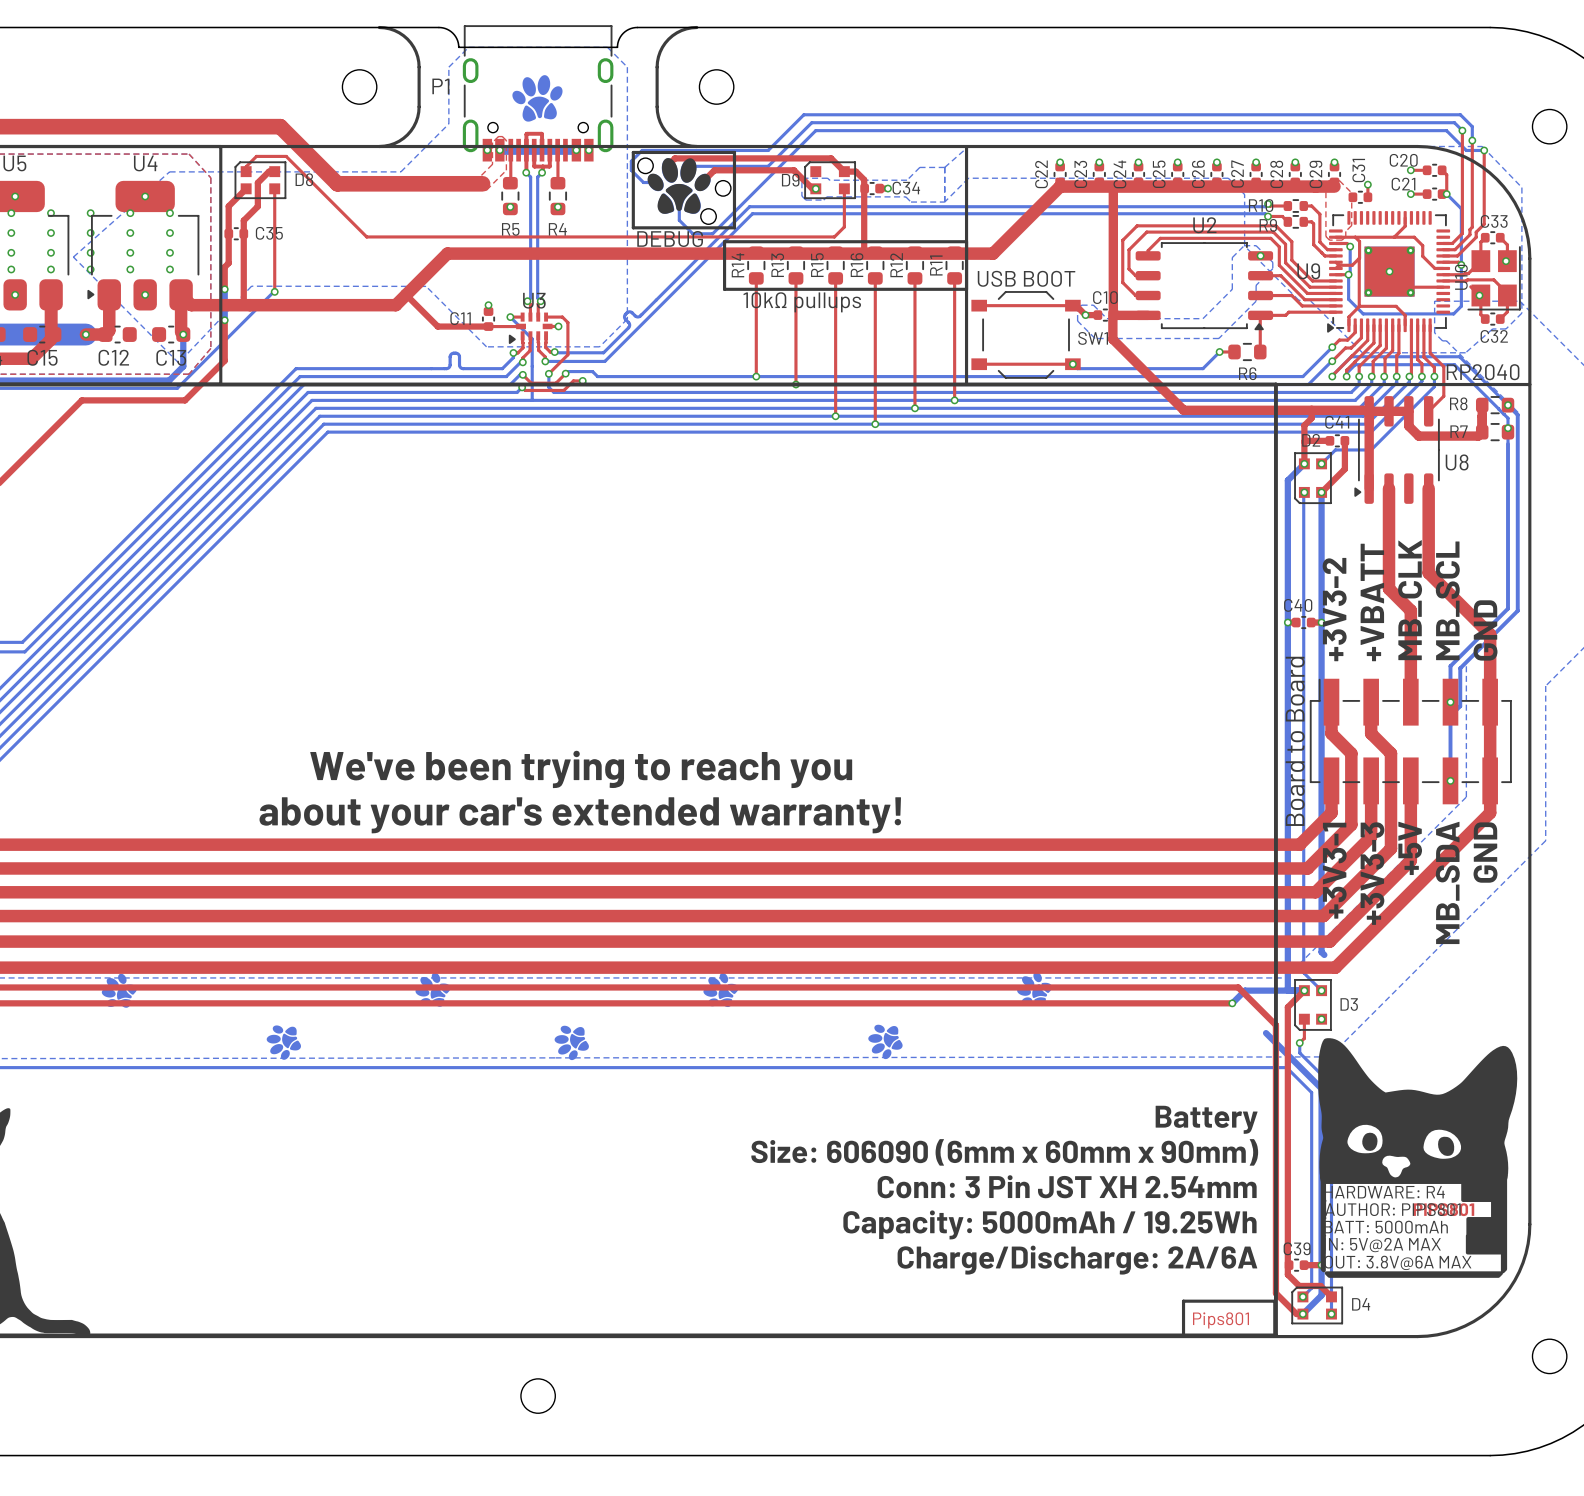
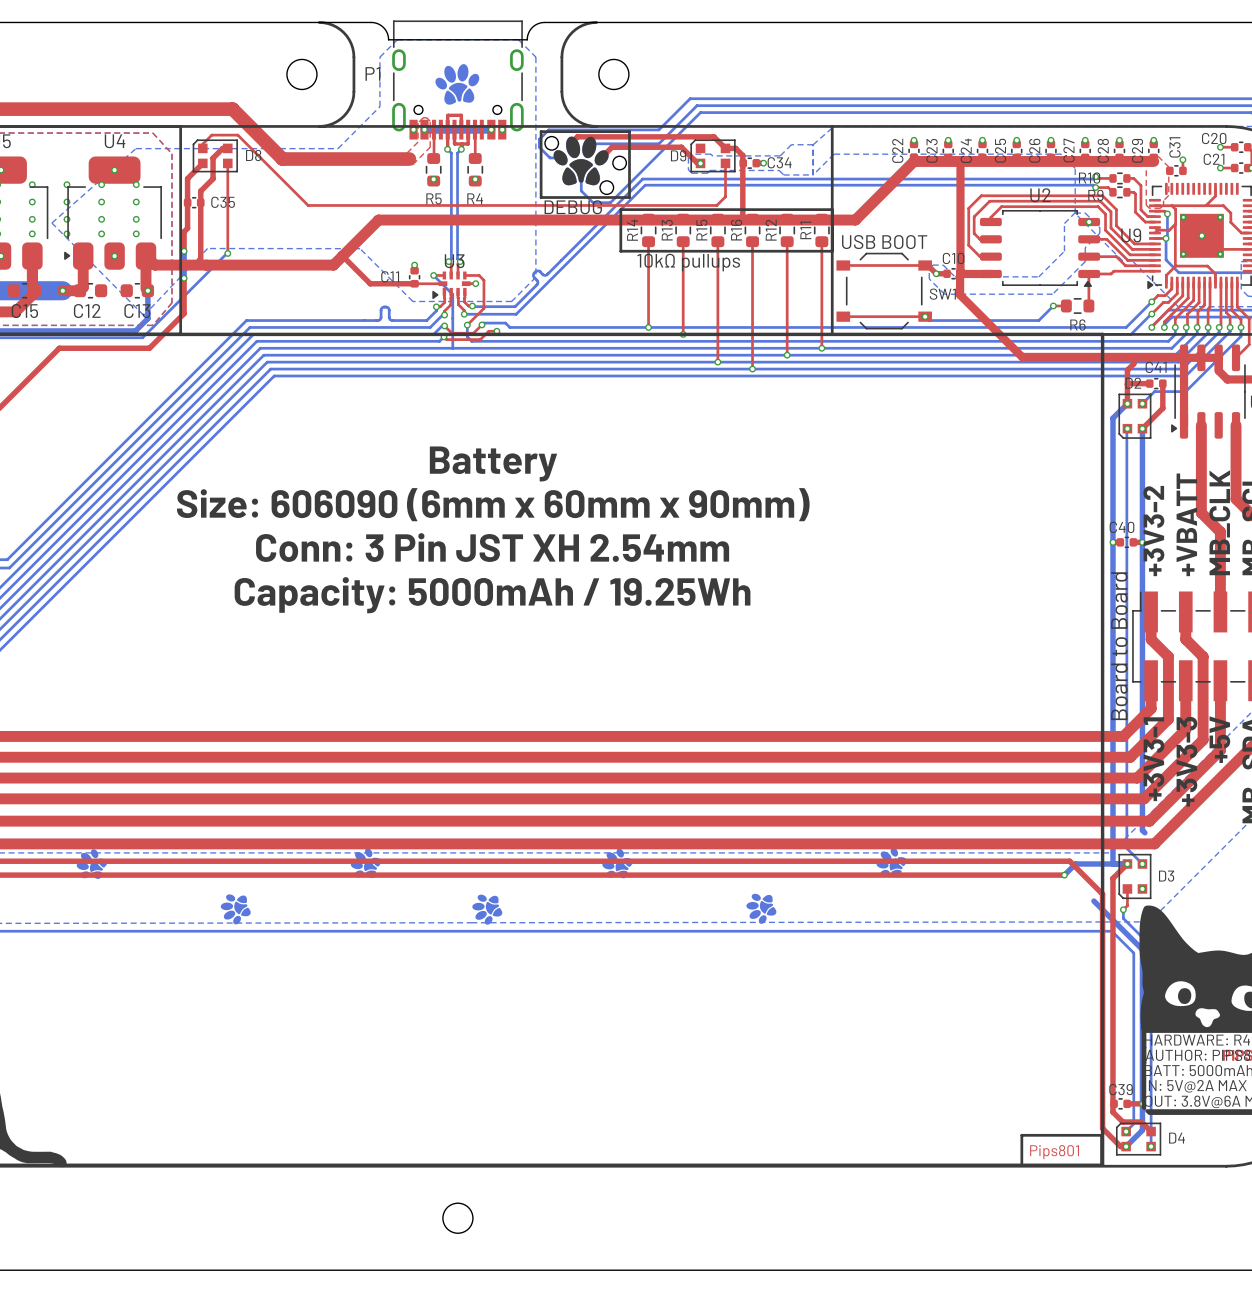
text: none -> Battery (493, 463)
text: none -> Size: 606090 (6mm x 60mm x 90mm) (493, 504)
text: none -> Conn: 3 Pin JST XH 2.54mm (492, 547)
text: none -> Capacity: 5000mAh / 19.25Wh (492, 595)
text: We've been trying to reach you (581, 769) -> none
text: about your car's extended warranty! (580, 815) -> none
text: Battery (1206, 1119) -> none
text: Size: 606090 (6mm x 60mm x 90mm) (1004, 1152) -> none
text: Conn: 3 Pin JST XH 2.54mm (1067, 1186) -> none
text: Capacity: 5000mAh / 19.25Wh (1049, 1224) -> none
text: Charge/Discharge: 2A/6A (1077, 1260) -> none

